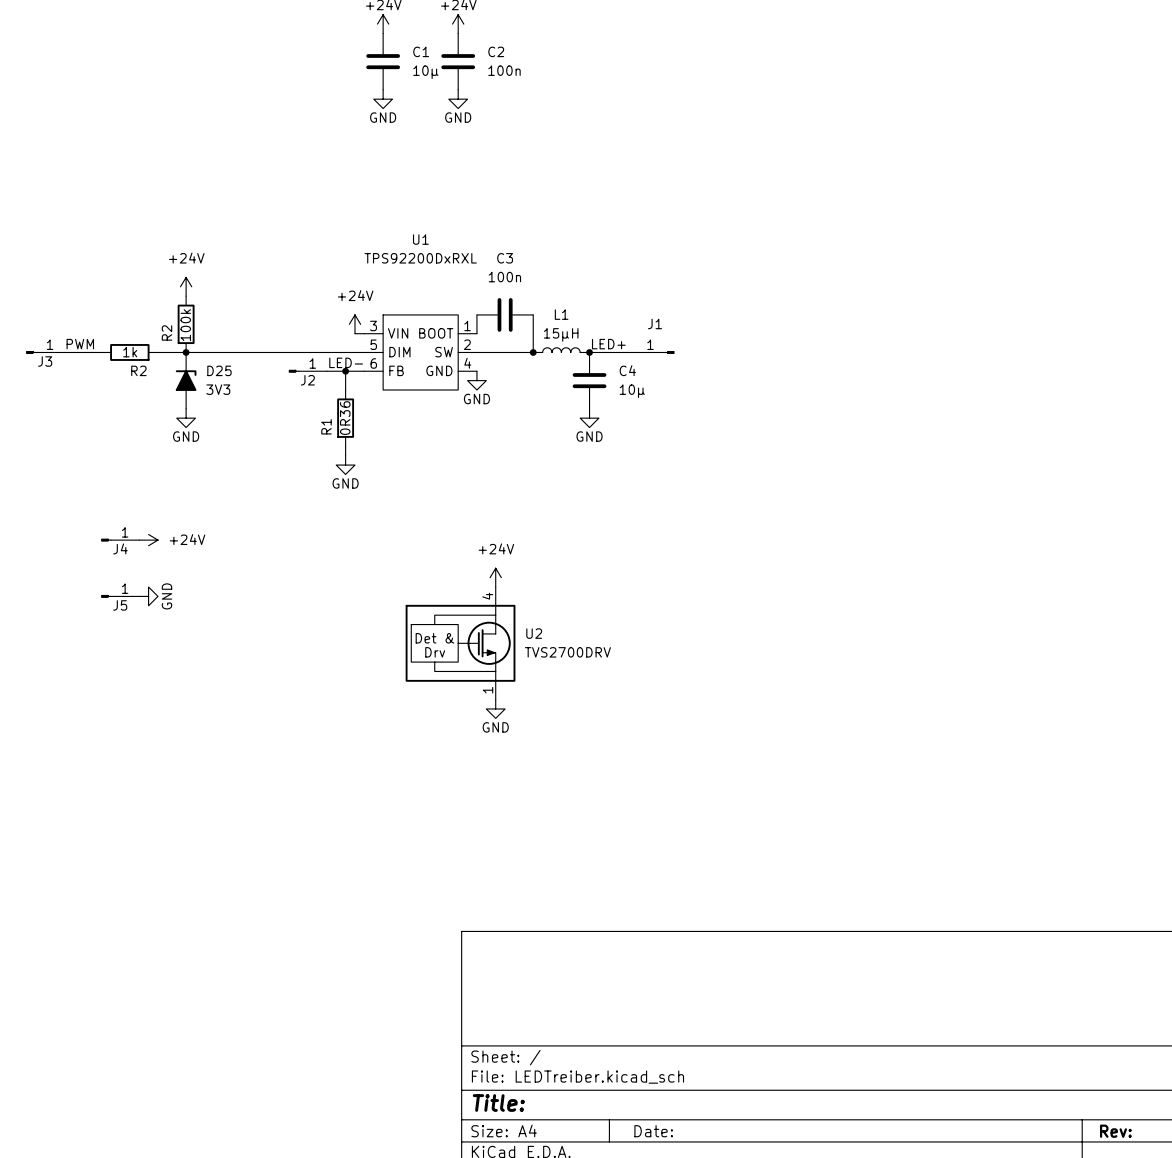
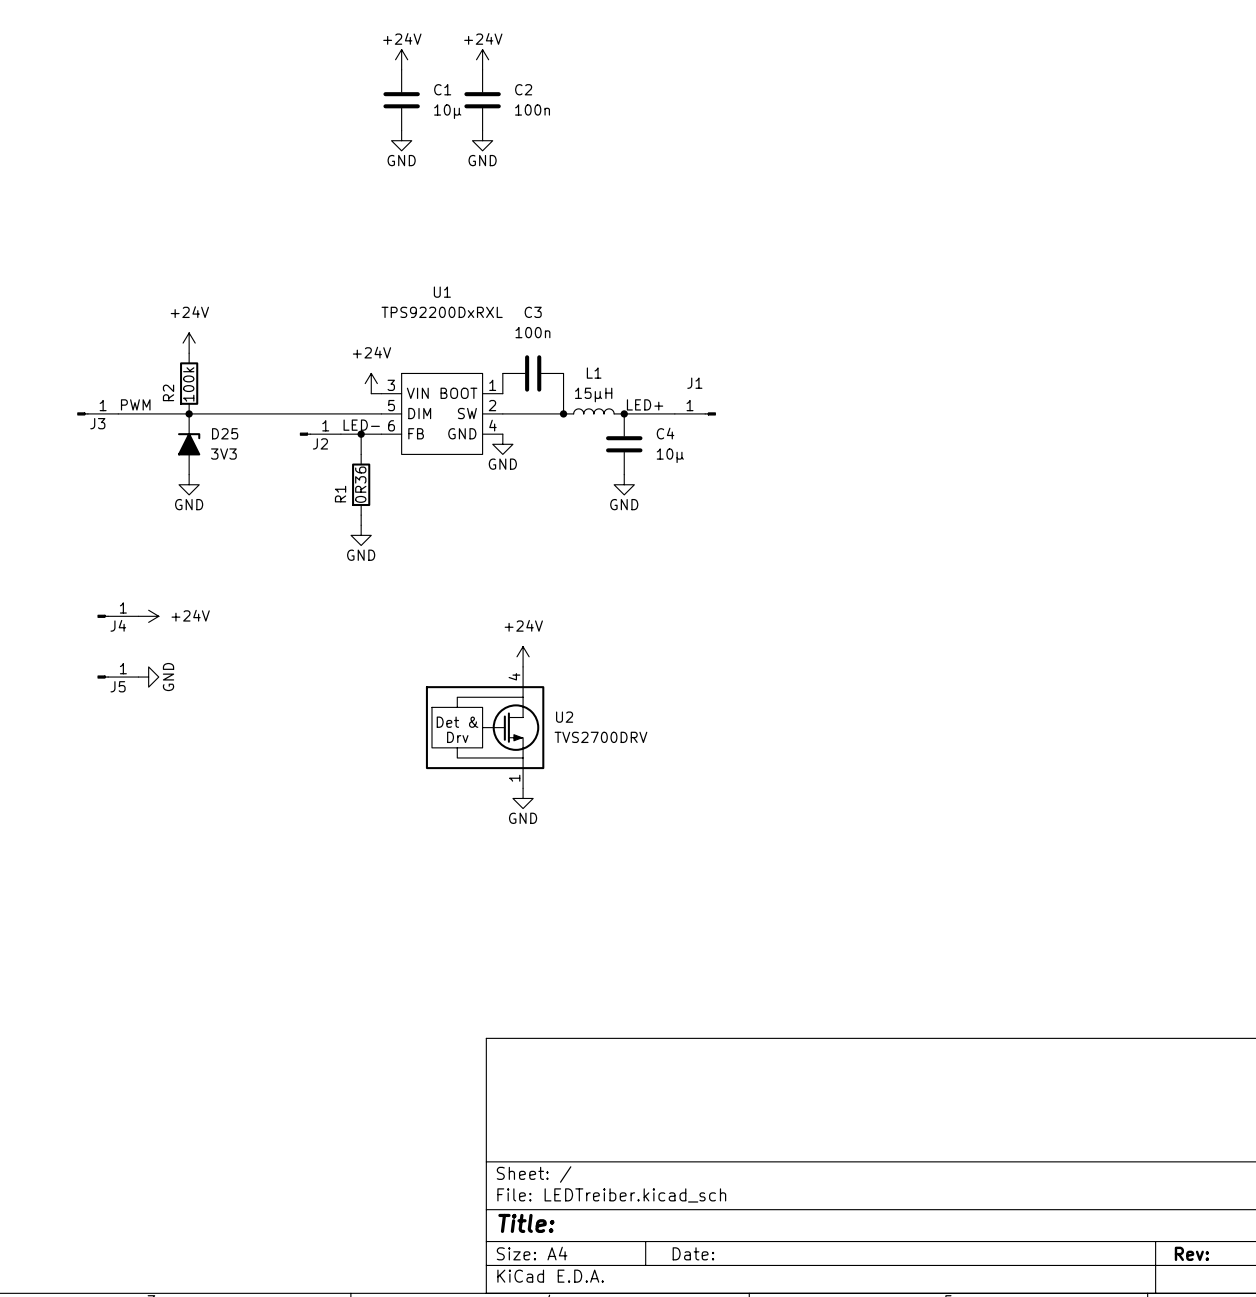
label position: PWM (80, 344) -> PWM (135, 404)
J3 position: (45, 352) -> (97, 413)
wire: (64, 352) (101, 352) -> (118, 413) (158, 413)
R2: 1k (129, 352) -> none

